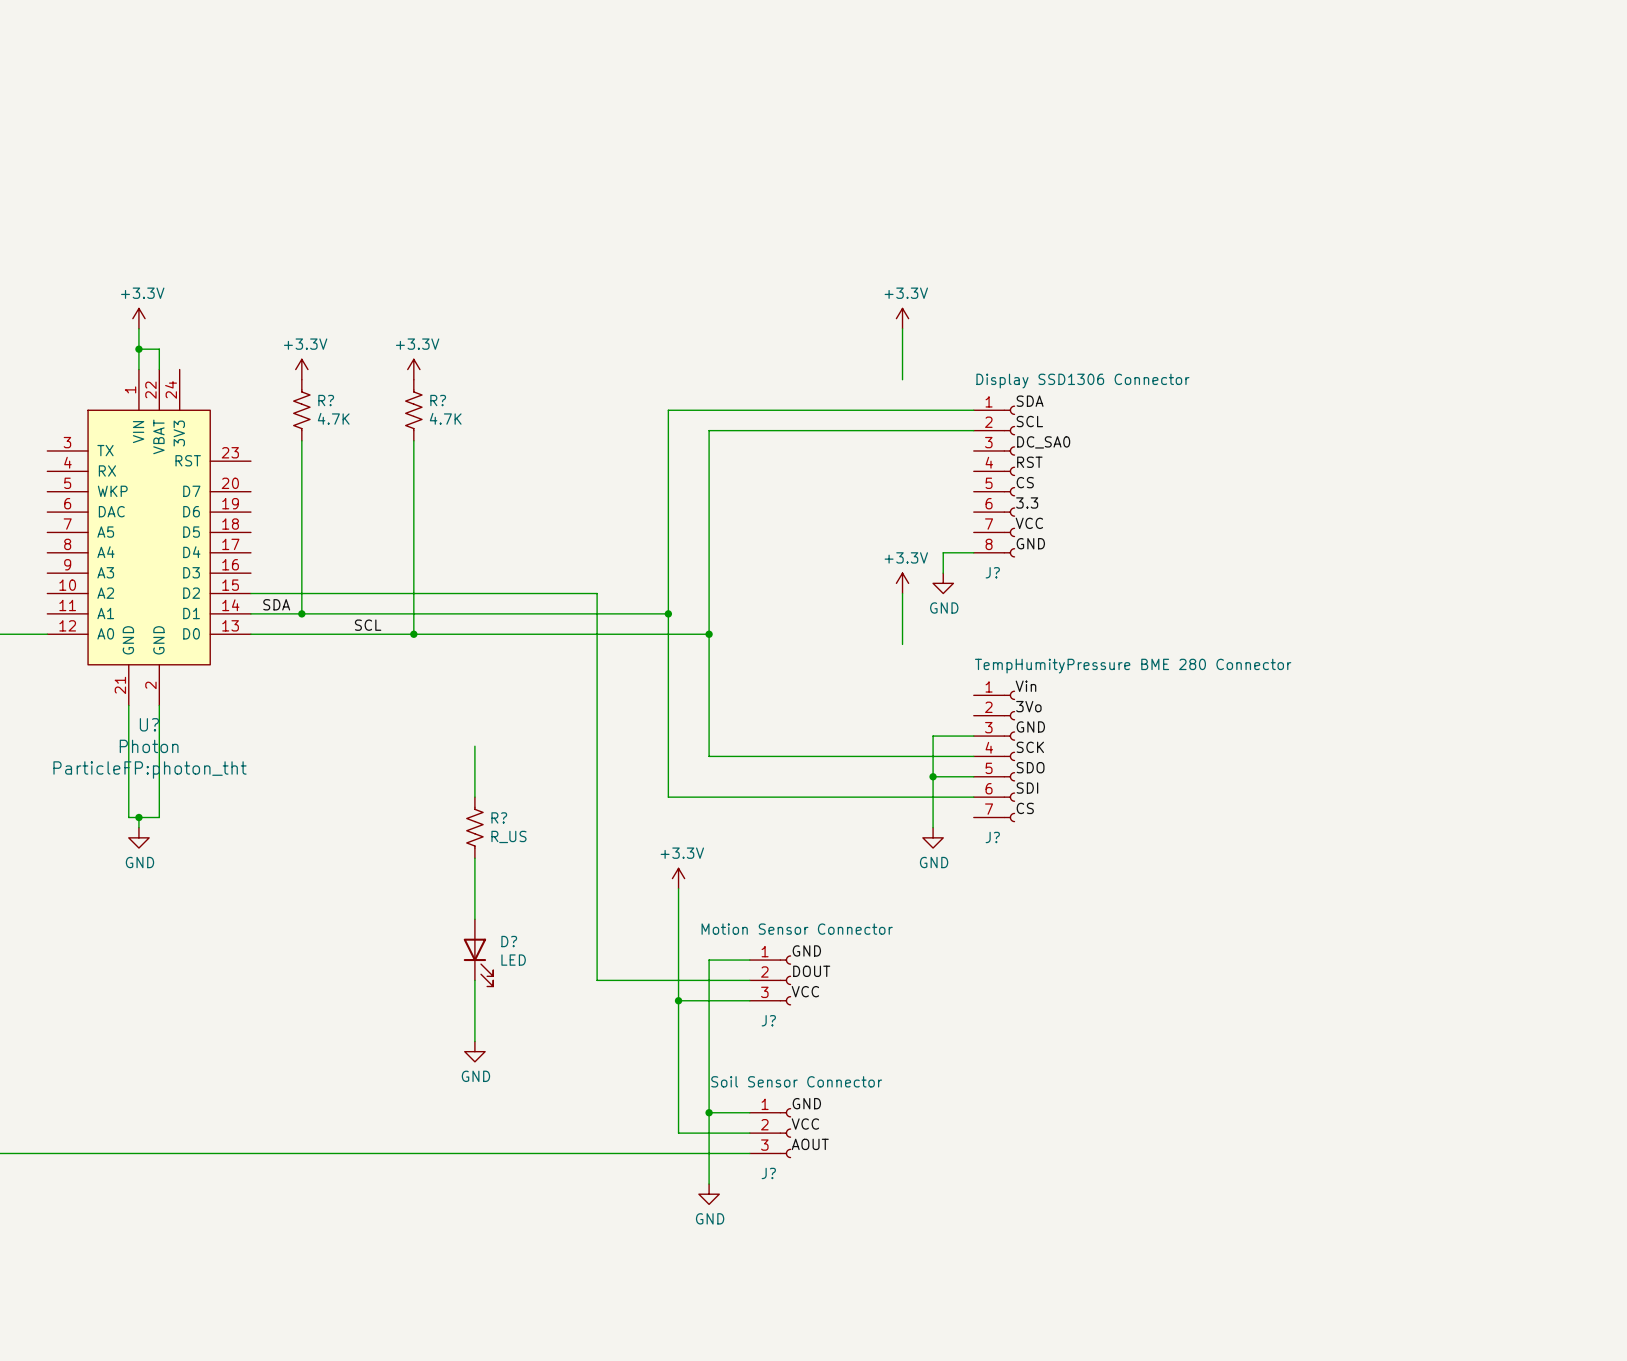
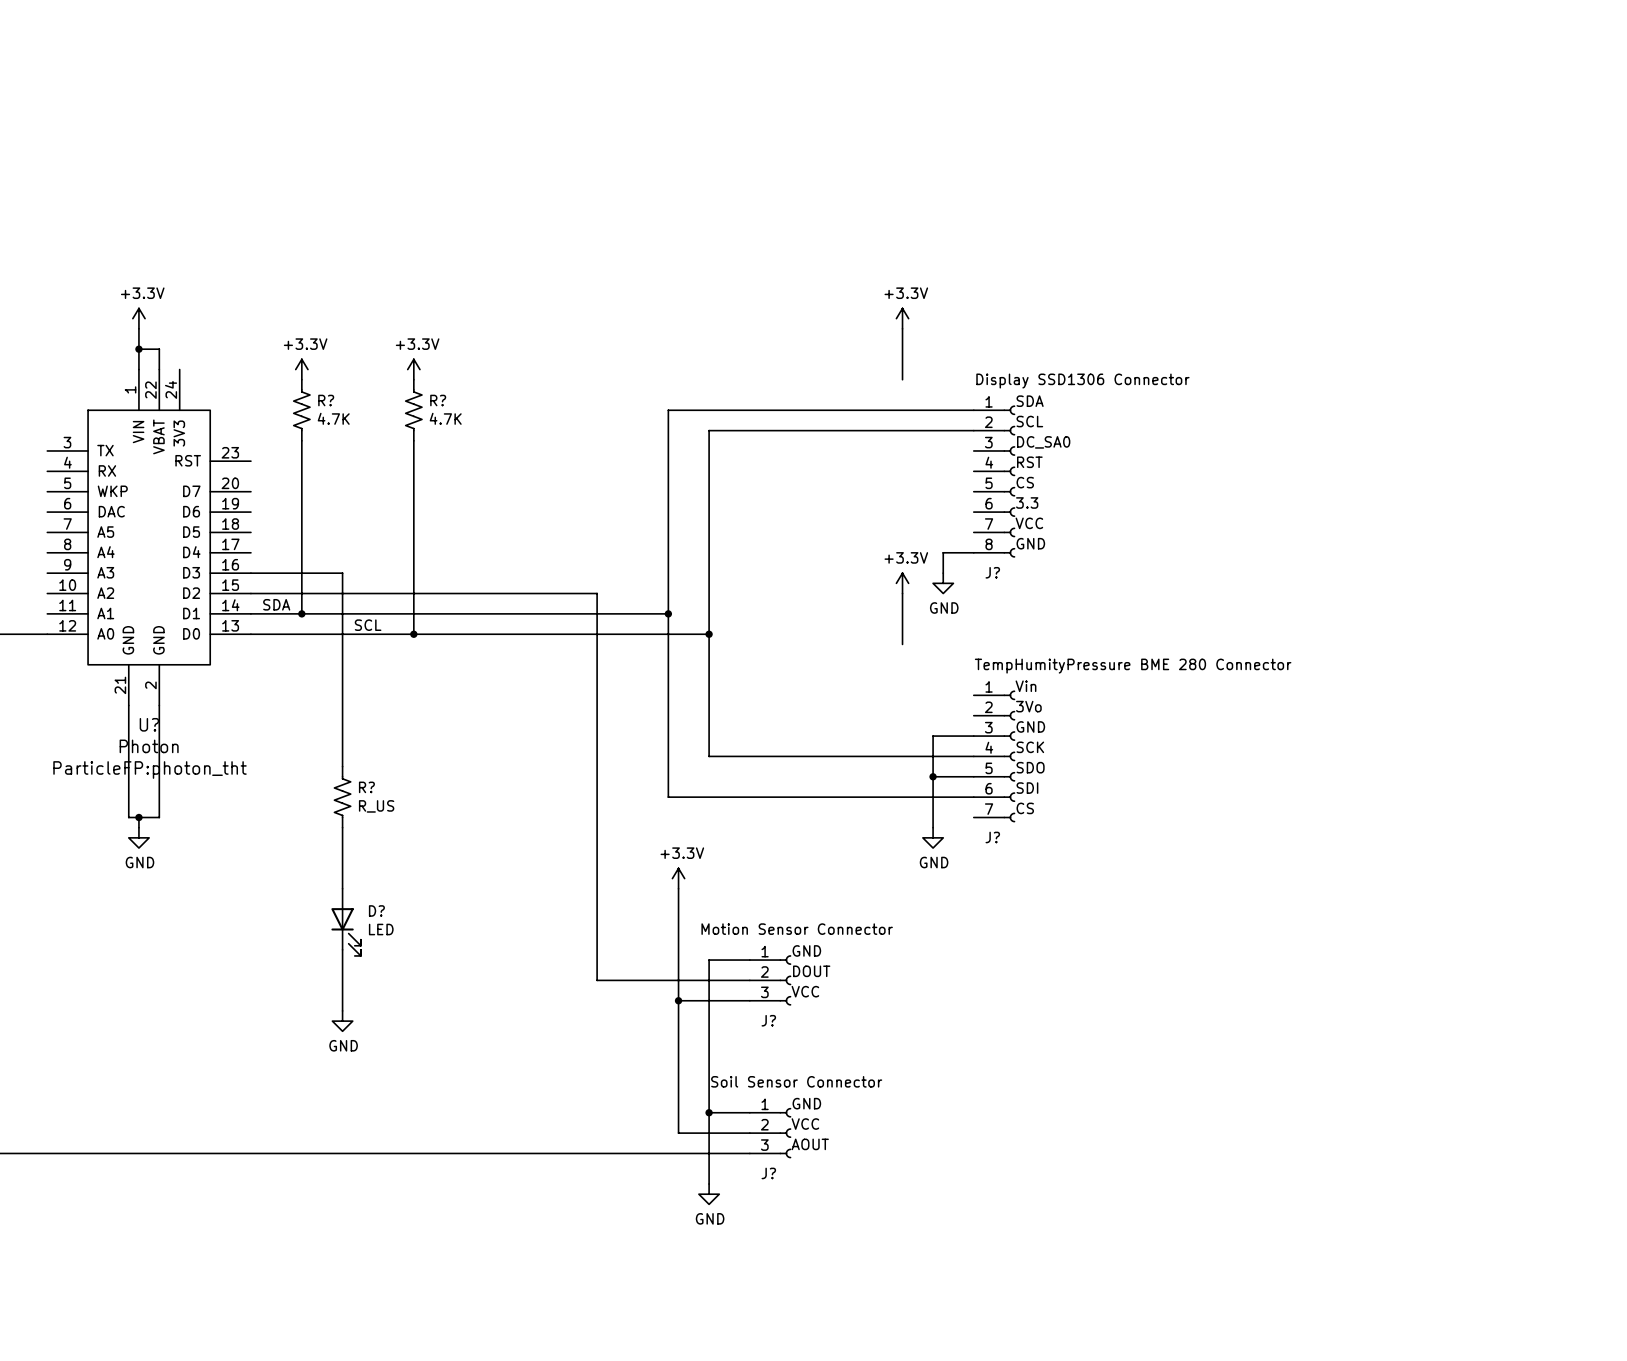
wire: none -> (250, 573) (342, 573) (342, 766)
wire: (474, 746) (474, 797) -> none
R? position: (474, 827) -> (342, 797)
wire: (474, 858) (474, 919) -> (342, 827) (342, 888)
D? position: (478, 952) -> (346, 922)
wire: (474, 980) (474, 1041) -> (342, 949) (342, 1010)
power symbol position: GND (474, 1051) -> GND (342, 1021)

